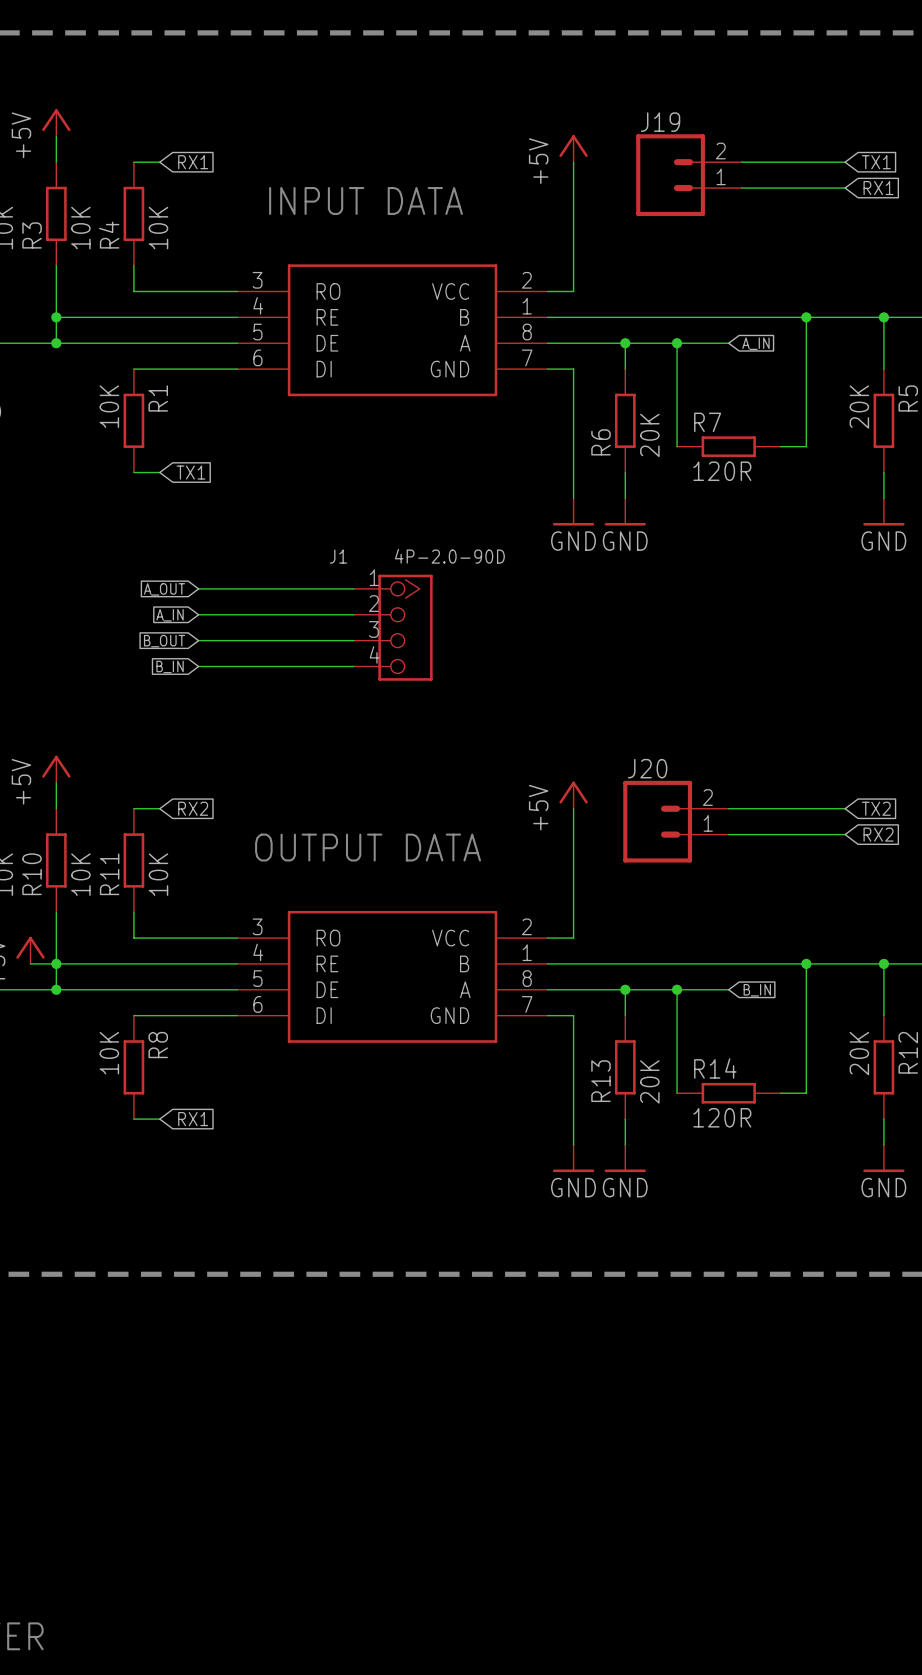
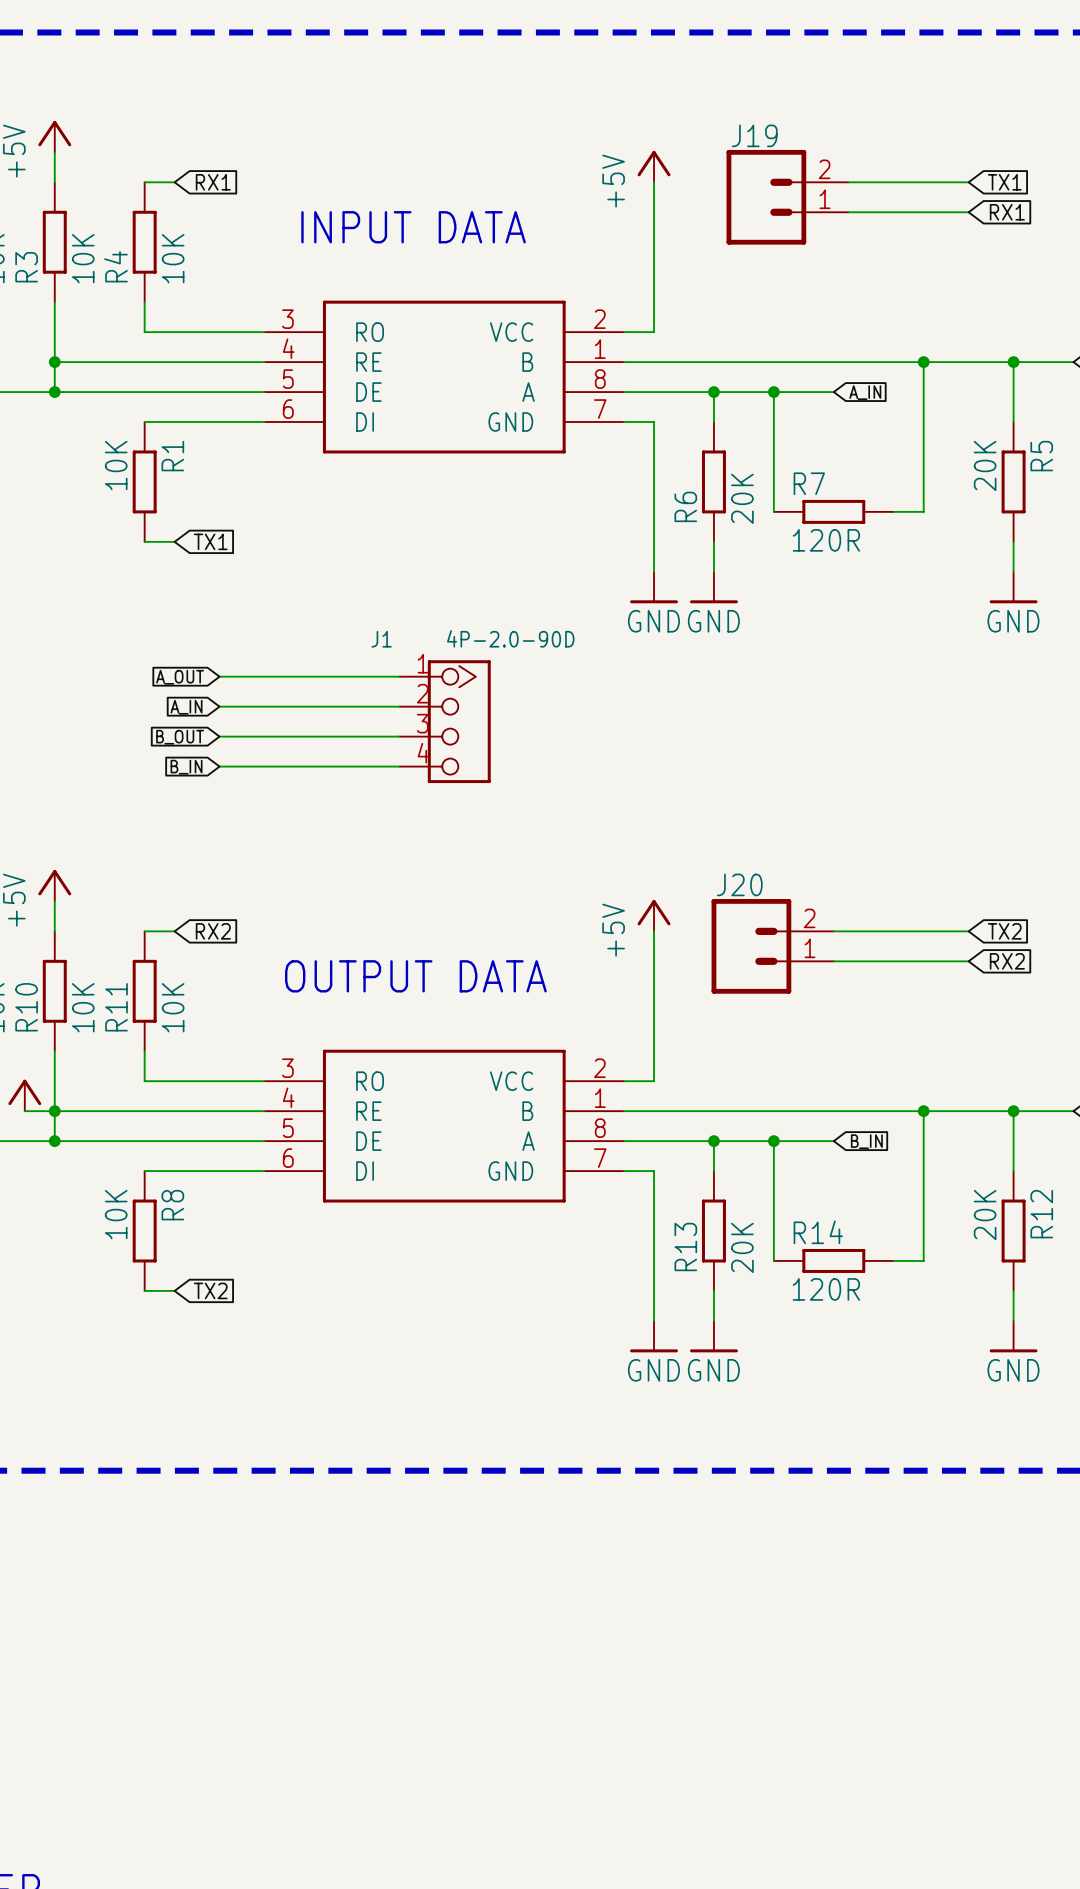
global label: RX1 (193, 1119) -> TX2 (210, 1290)

